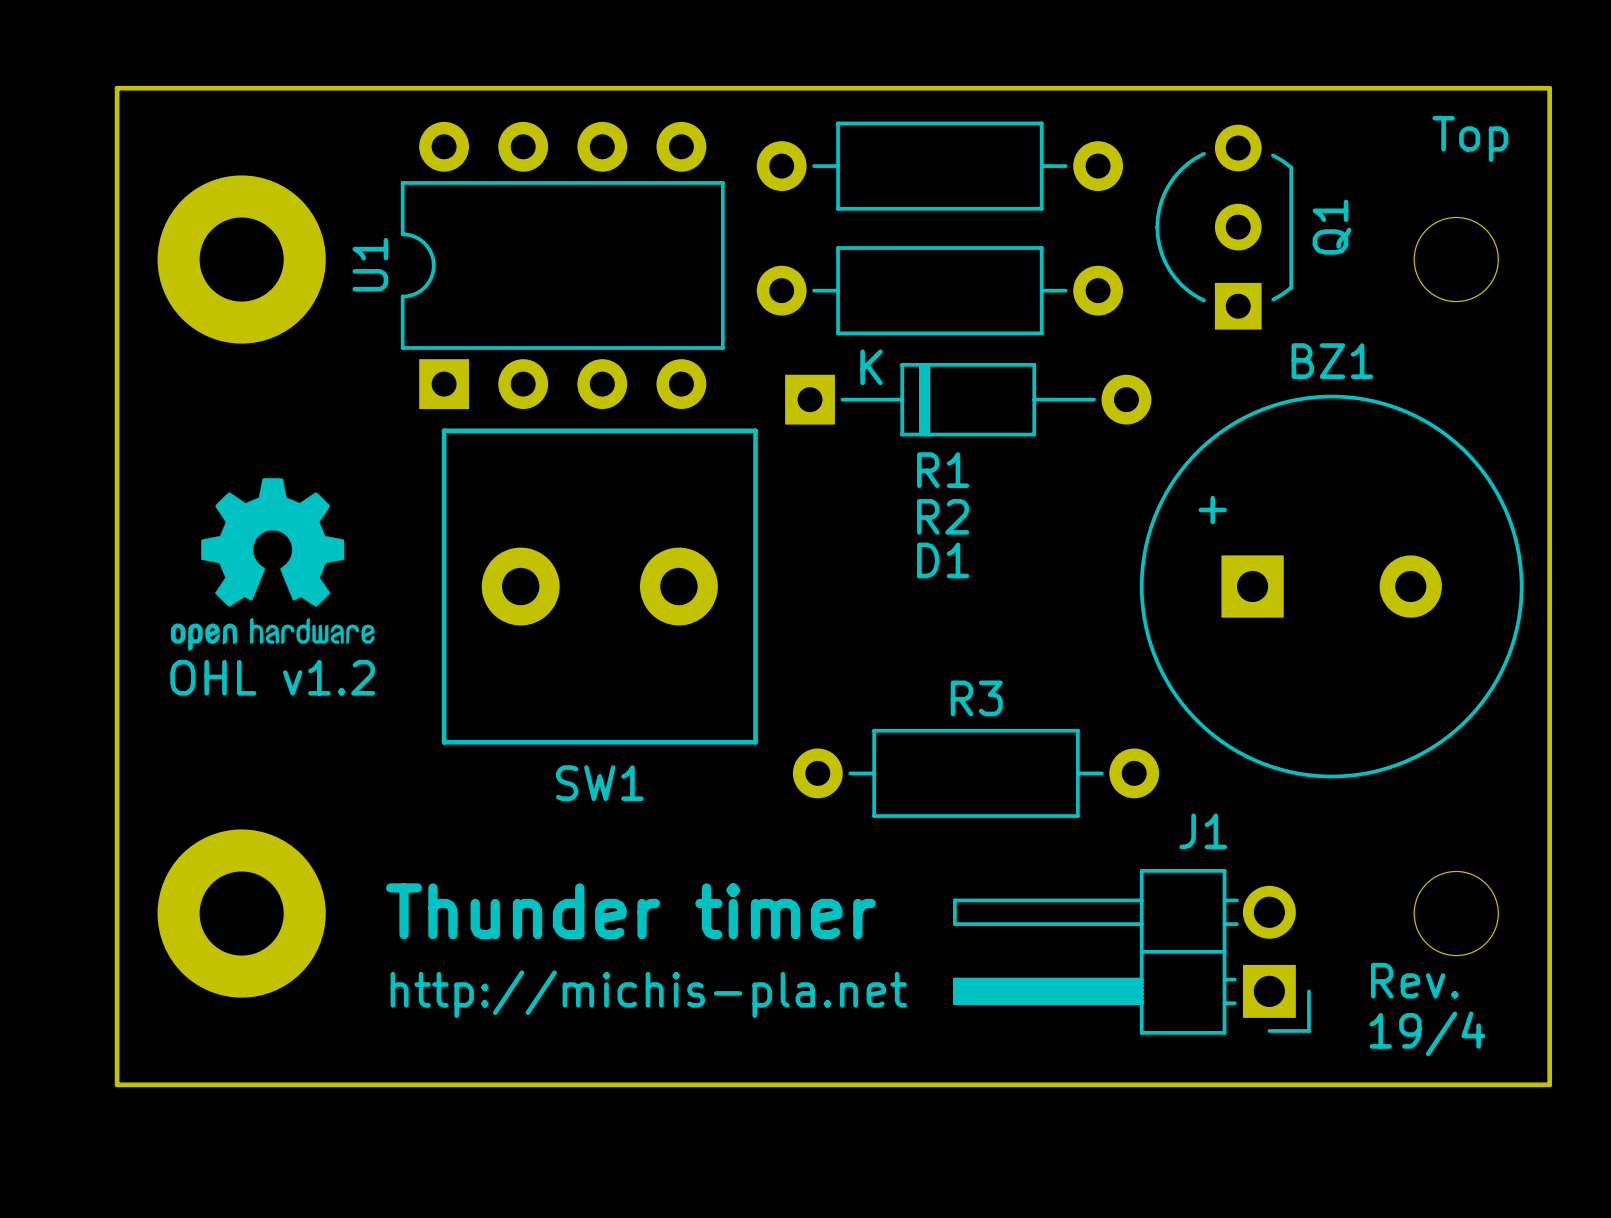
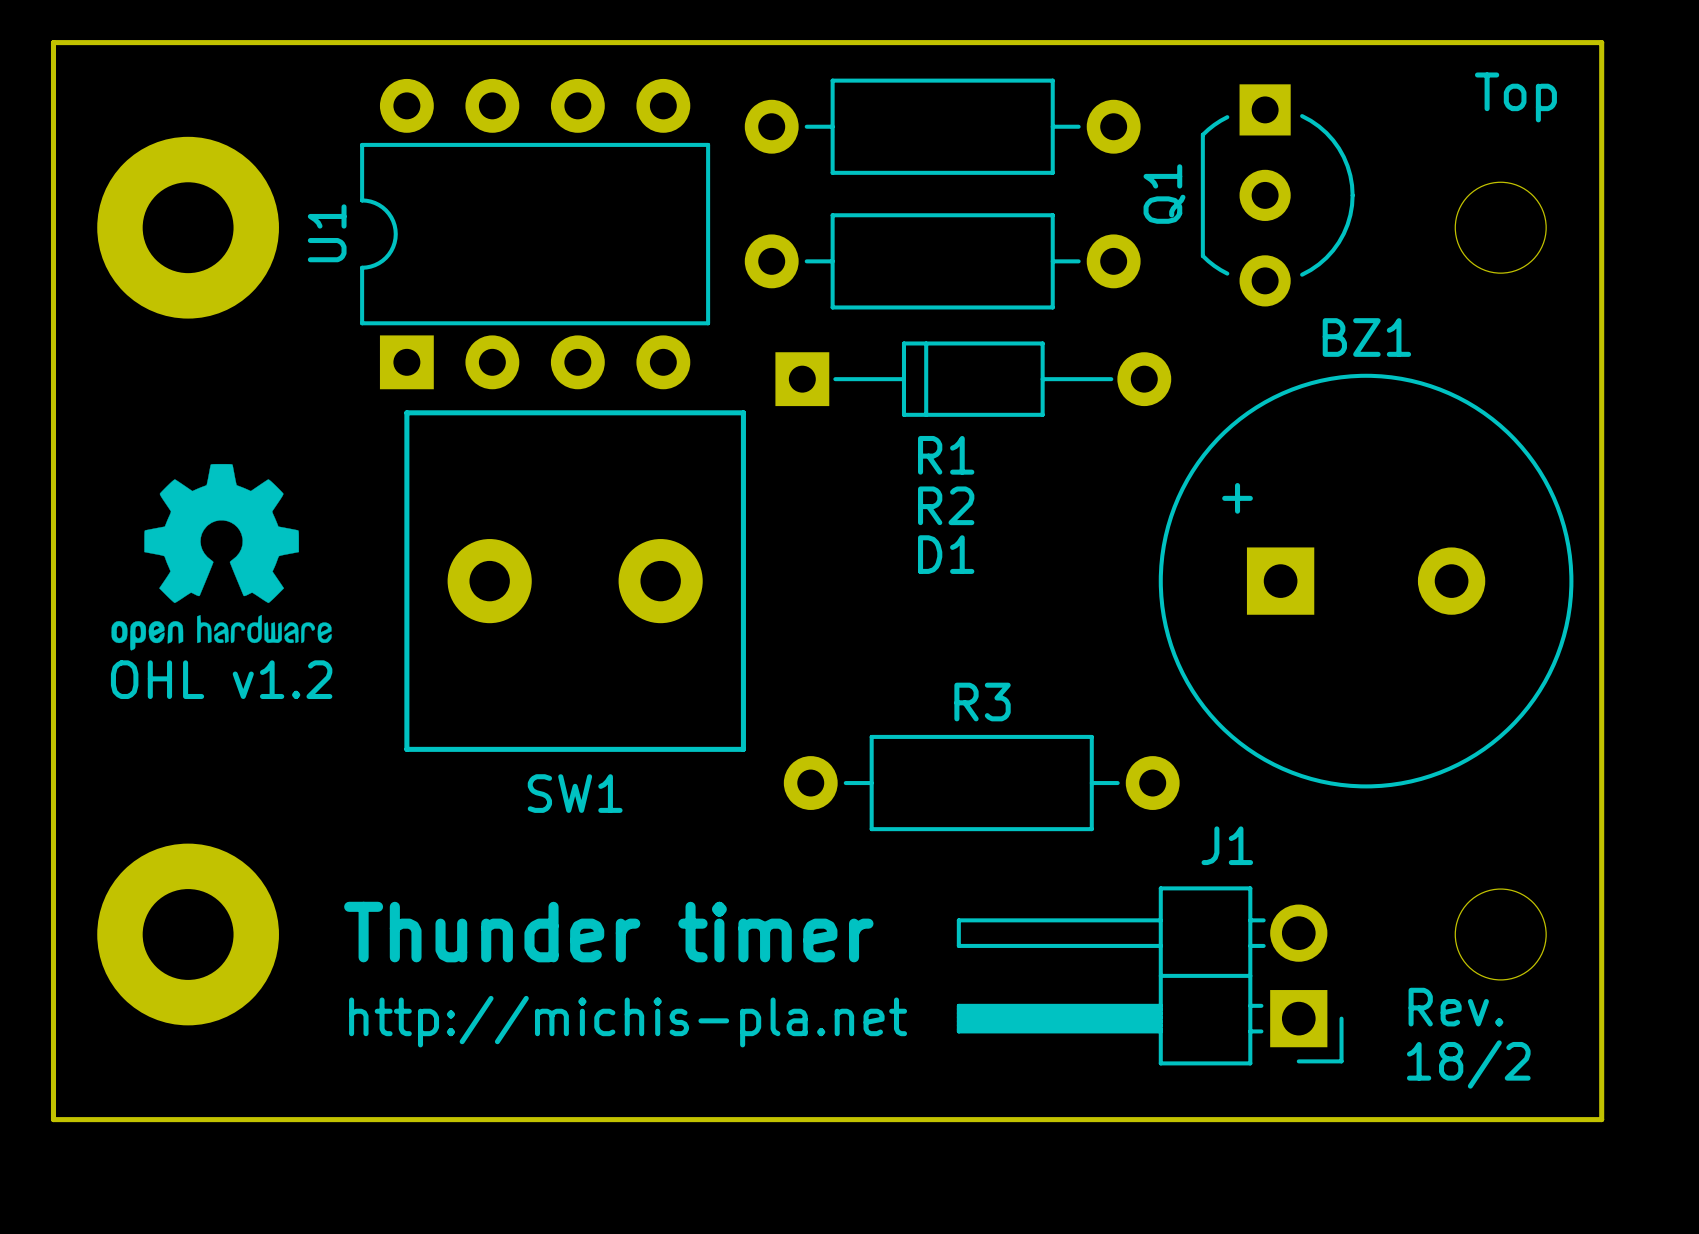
Q1 footprint: [1155, 124, 1294, 330] -> [1200, 84, 1355, 307]
Q1 name position: Q1 (1331, 227) -> Q1 (1164, 194)
D1 footprint: [785, 362, 1152, 437] -> [775, 341, 1172, 417]
text: 19/4 (1427, 1033) -> 18/2 (1468, 1064)

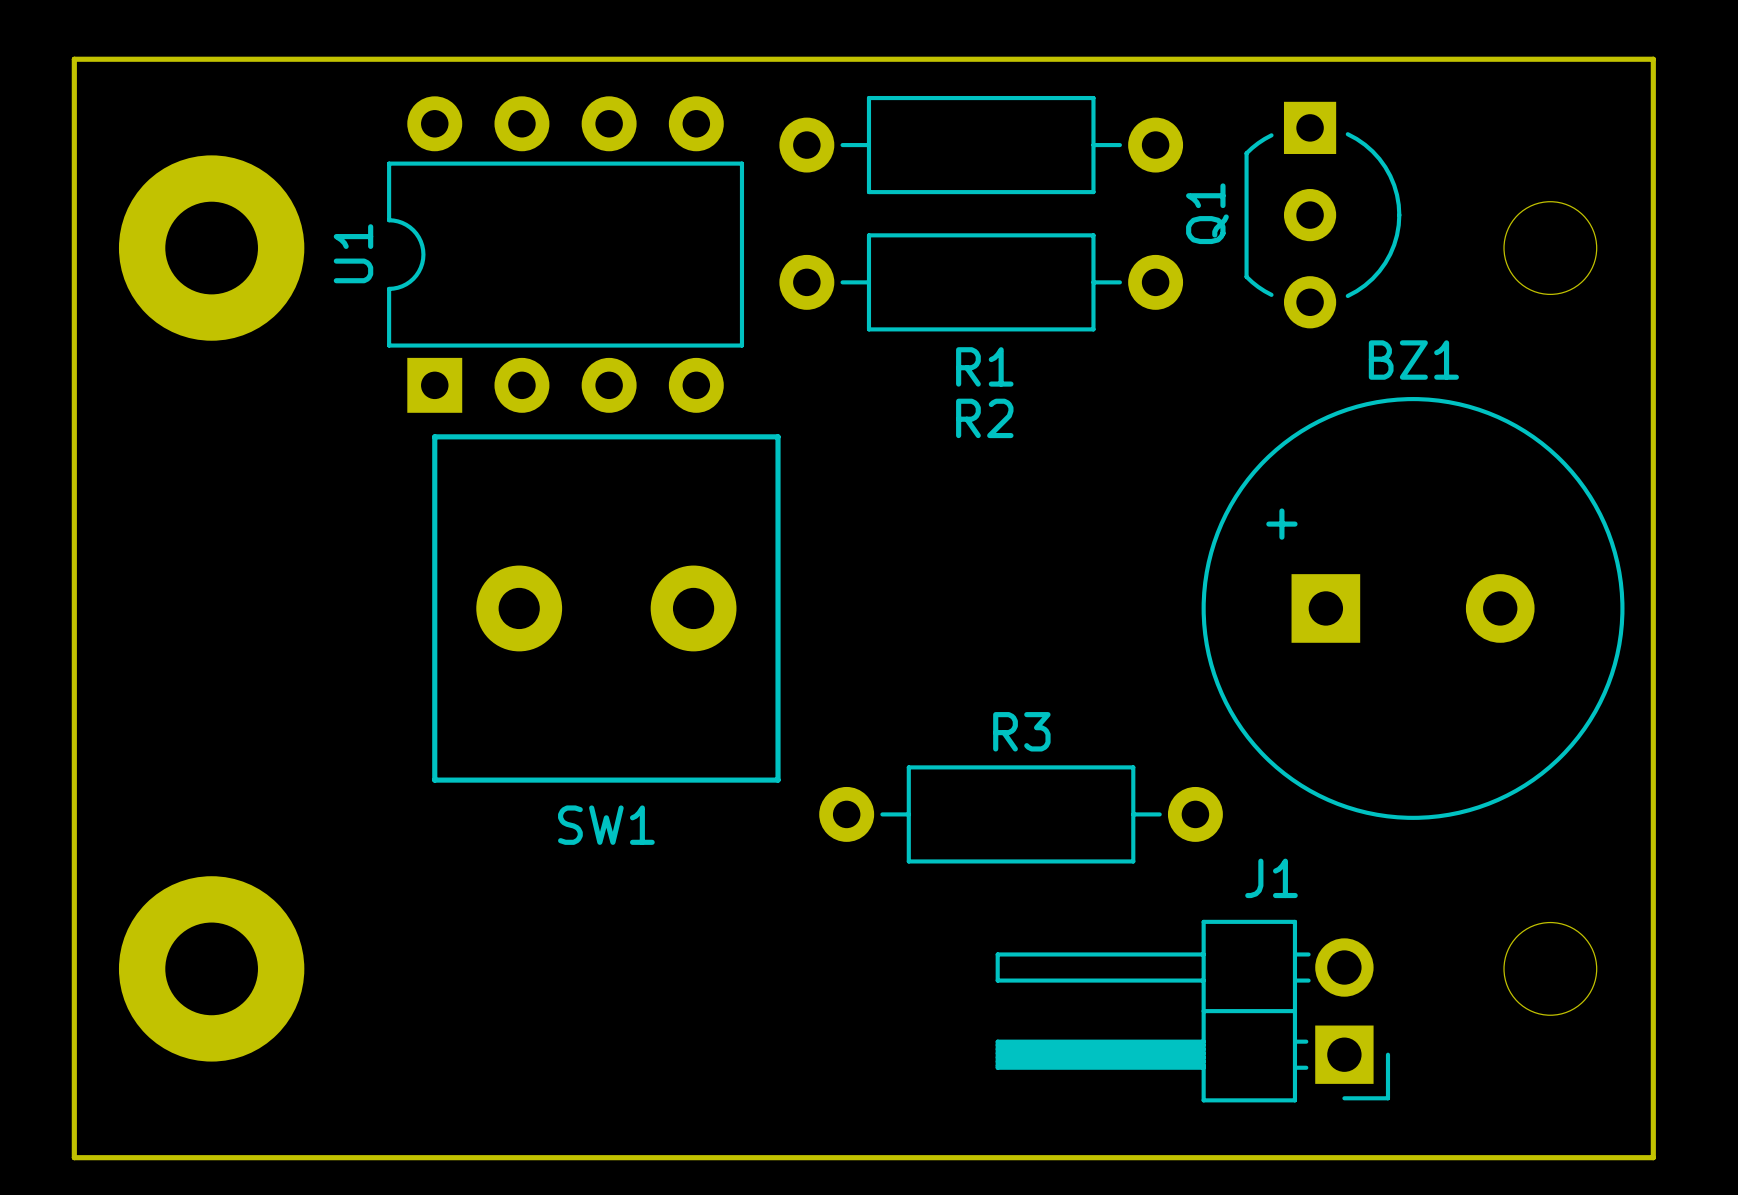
text: Top (1515, 97) -> none
D1: (973, 379) -> none
R1 name position: R1 (946, 455) -> R1 (984, 366)
drawing: [111, 463, 332, 651] -> none
R2 name position: R2 (946, 505) -> R2 (984, 418)
text: OHL v1.2 (221, 679) -> none
text: Thunder timer (608, 932) -> none
text: Rev. (1455, 1007) -> none
text: http://michis-pla.net (628, 1021) -> none
text: 18/2 (1468, 1064) -> none

